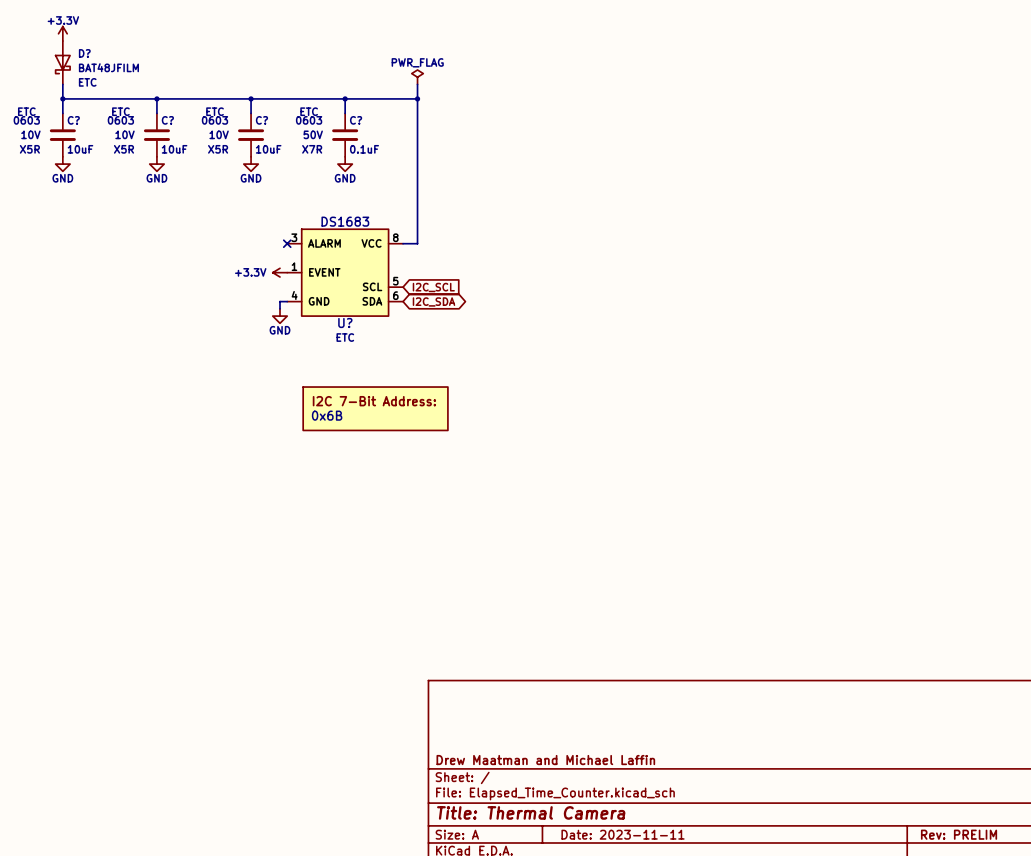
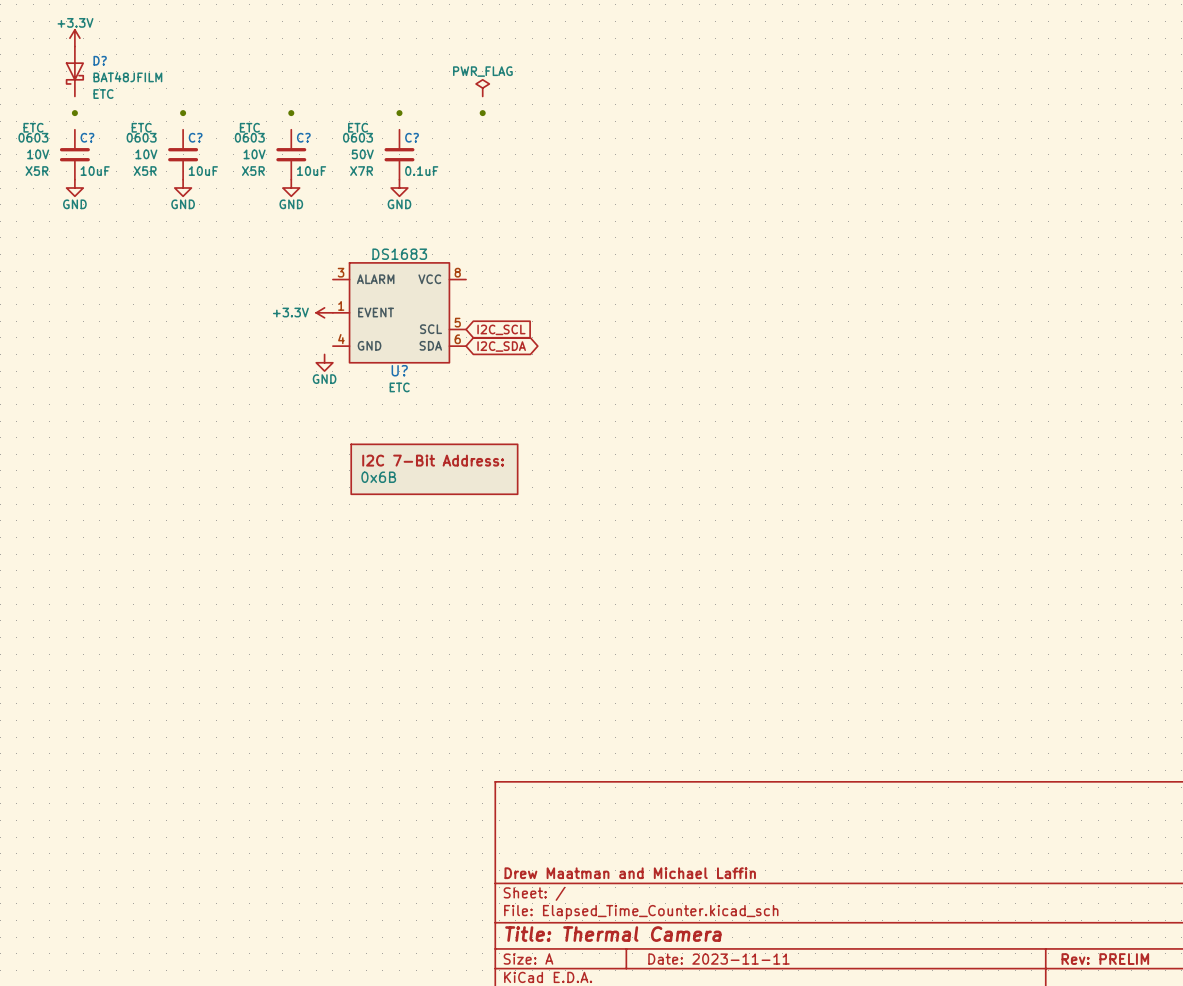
wire: (62, 84) (62, 113) -> none
wire: (417, 84) (417, 243) (403, 243) -> none
wire: (62, 98) (417, 98) -> none
wire: (156, 98) (156, 113) -> none
wire: (251, 98) (251, 113) -> none
wire: (345, 98) (345, 113) -> none
no-connect mark: (287, 243) -> none
wire: (287, 301) (280, 301) (280, 308) -> none

